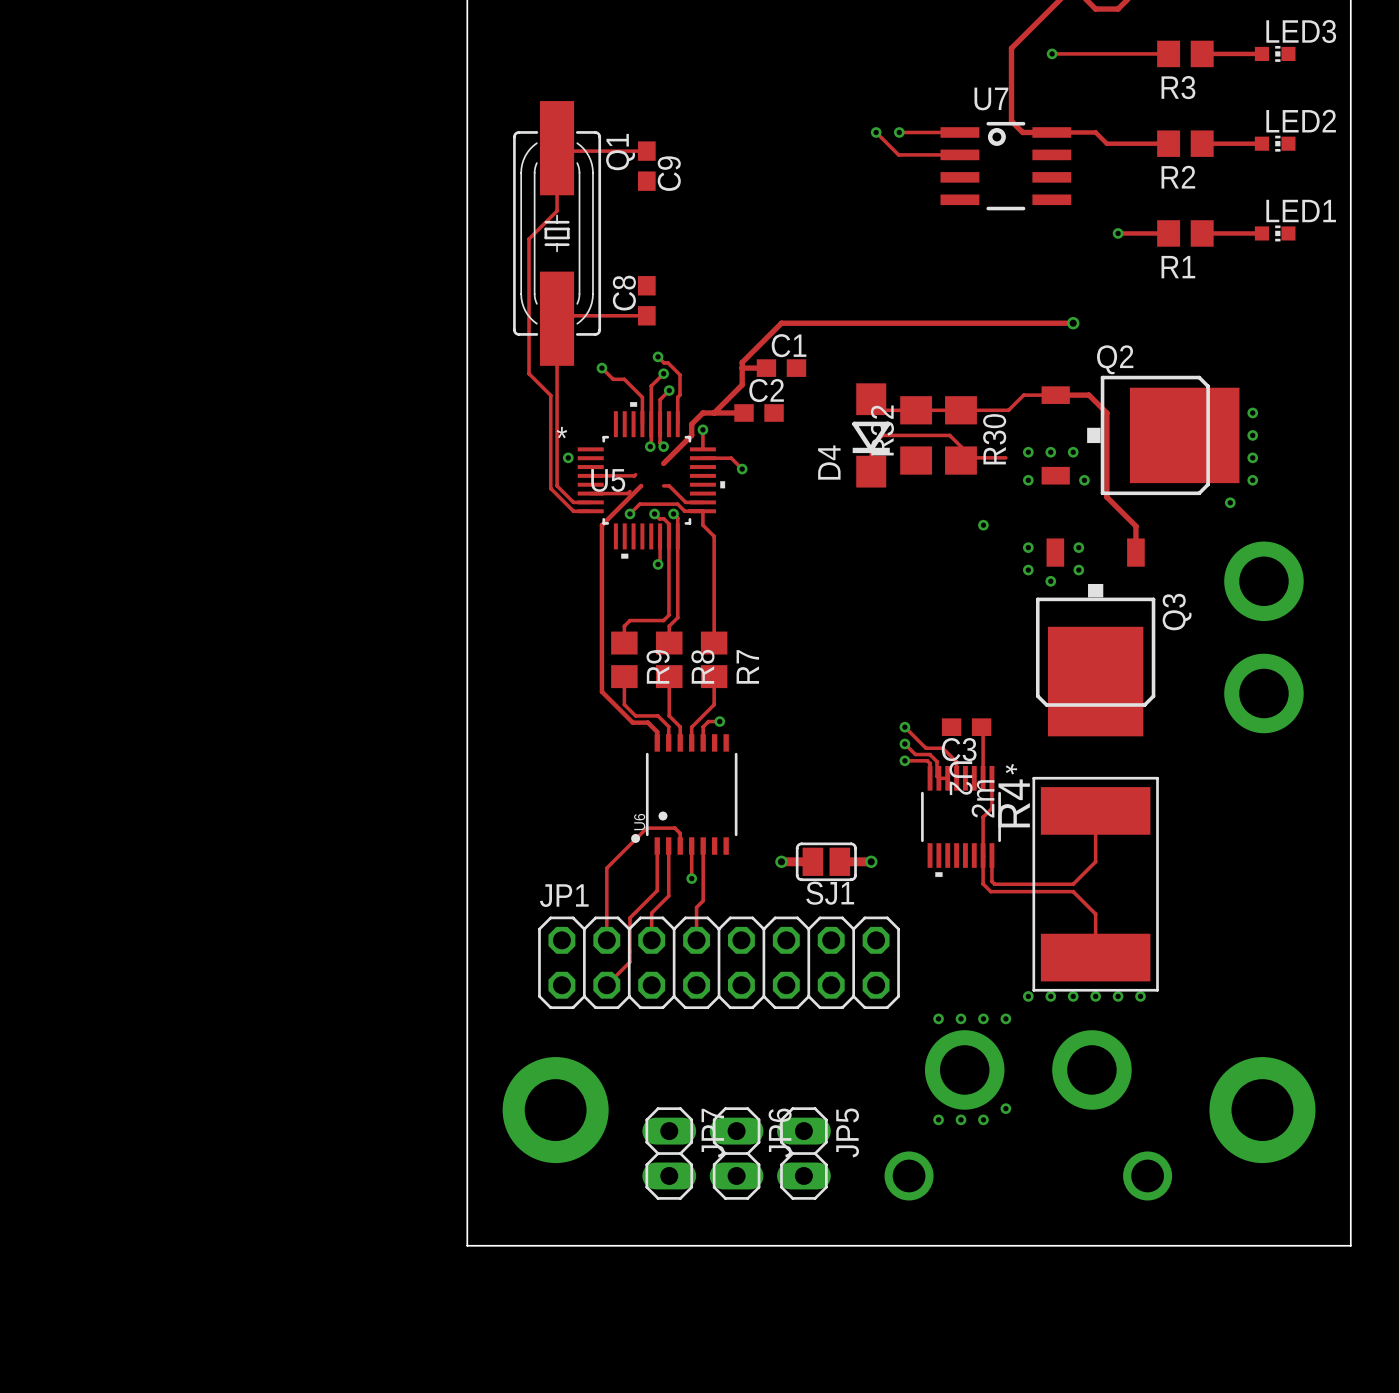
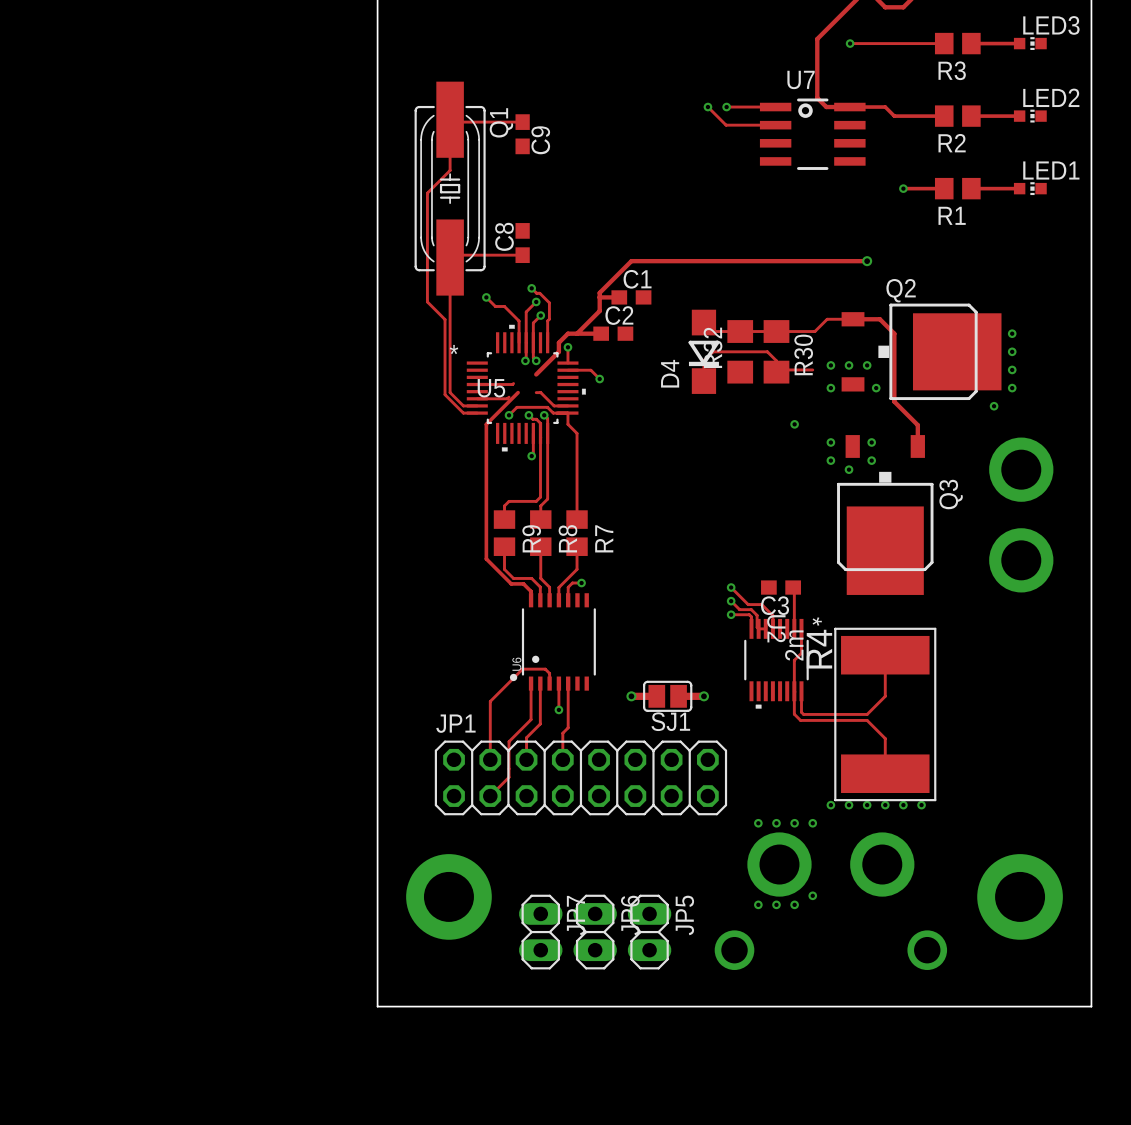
via: (568, 457) -> none

